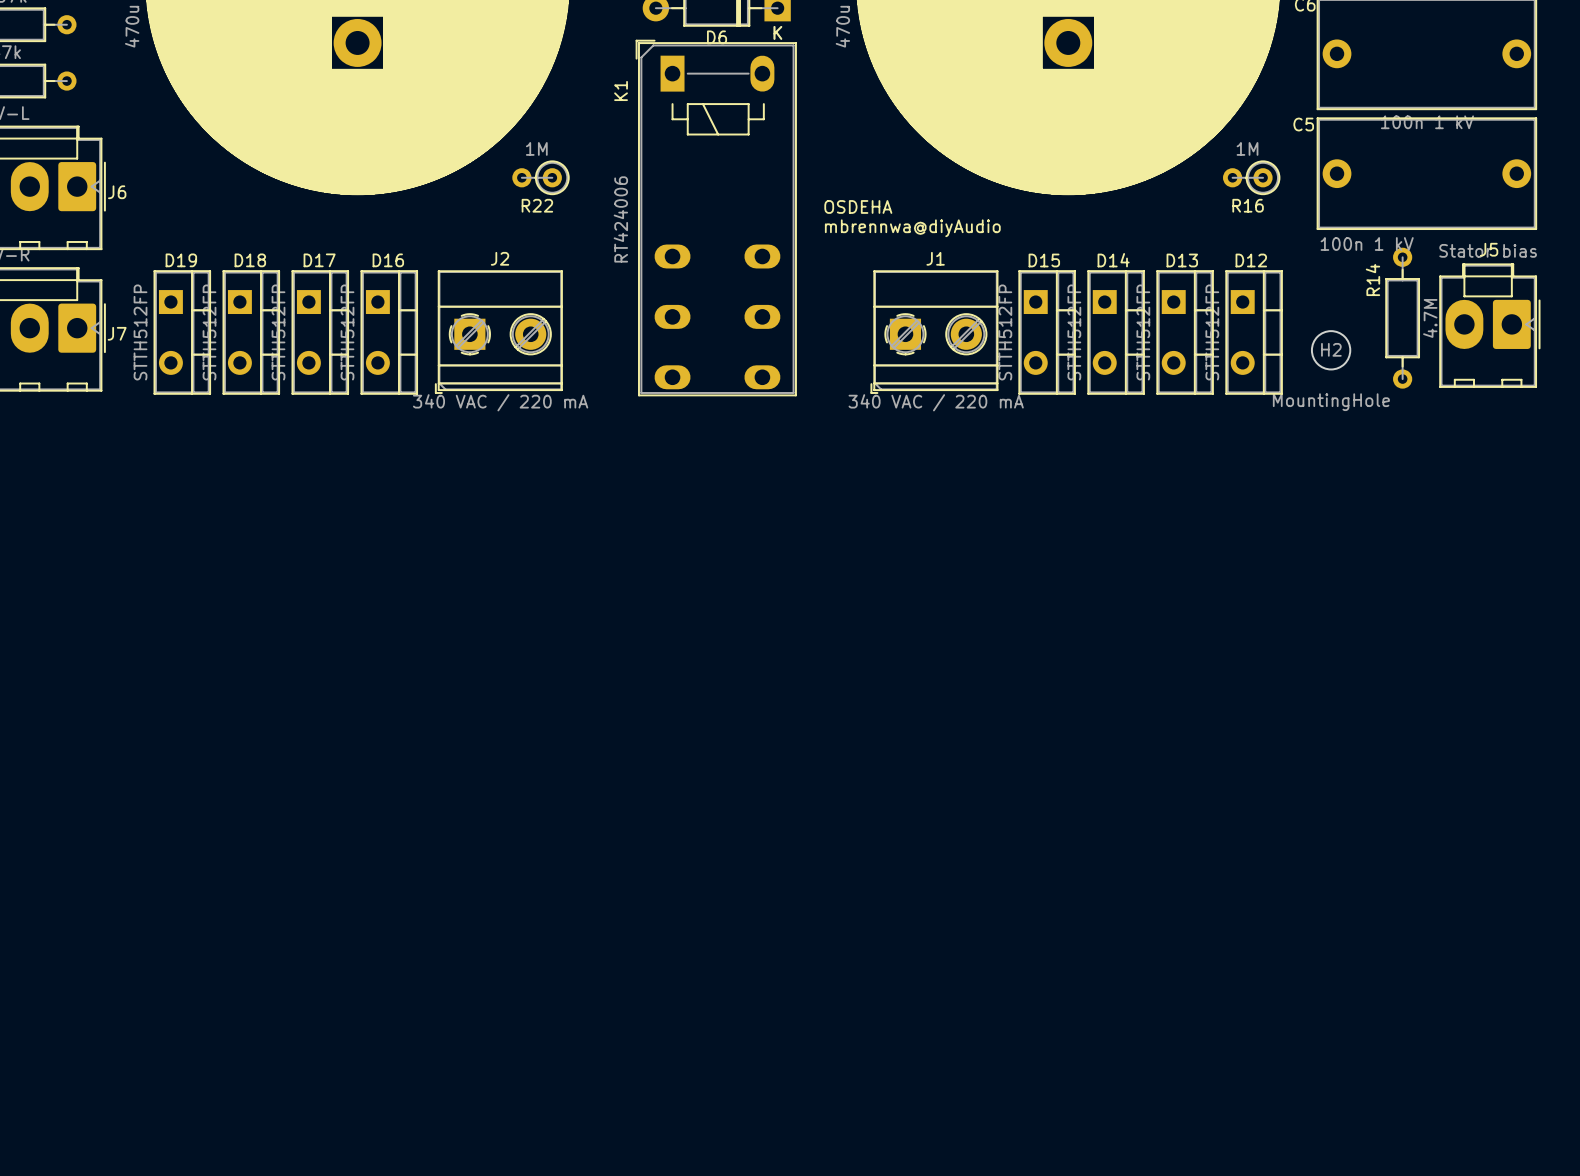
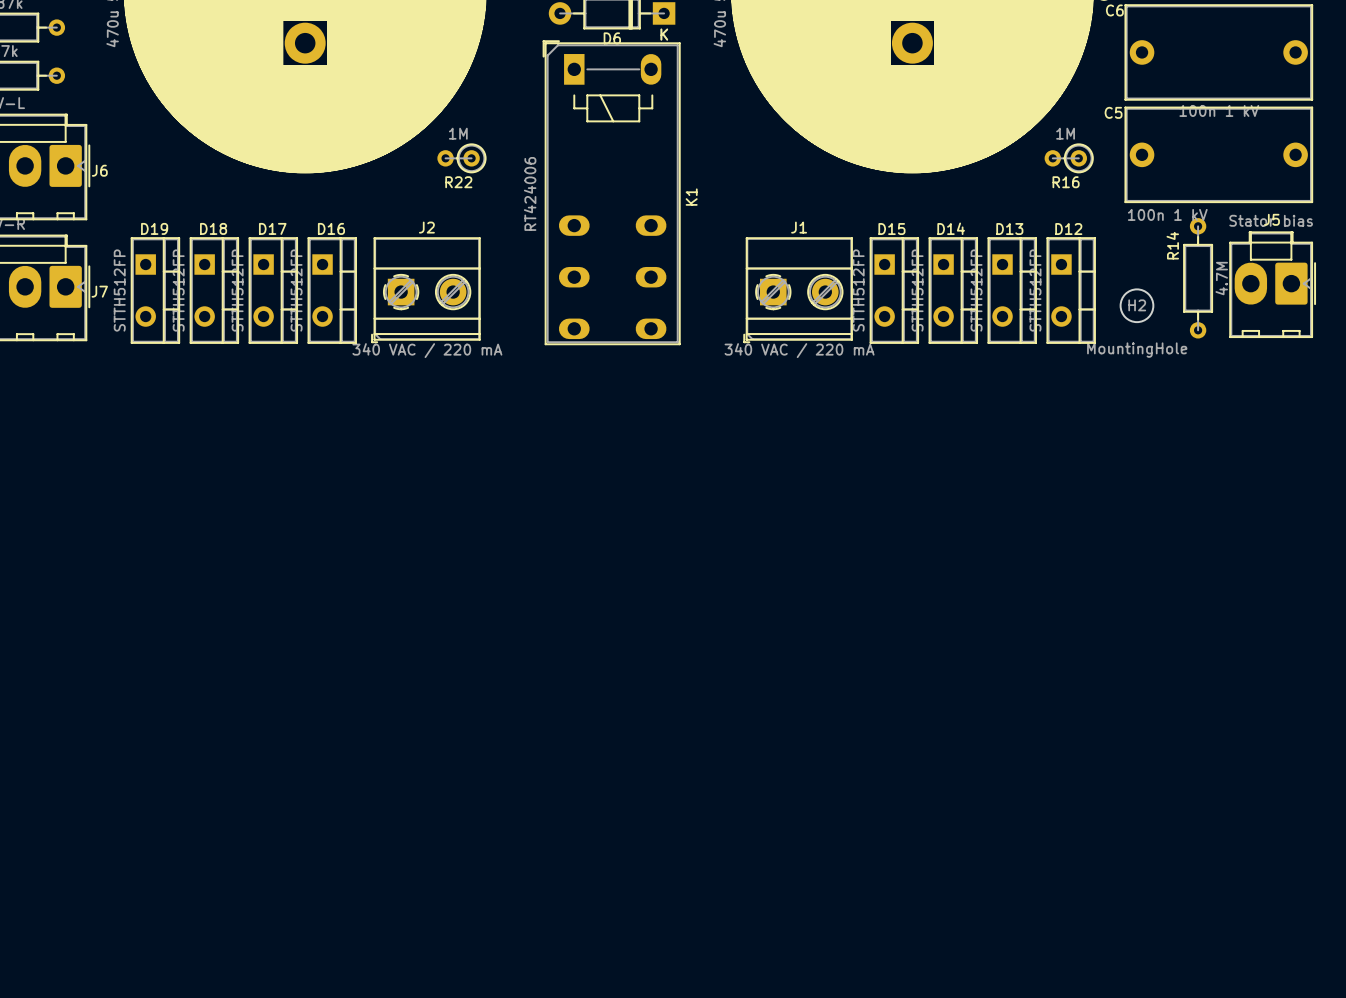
K1 name position: K1 (621, 90) -> K1 (691, 197)
text: OSDEHA (858, 206) -> none
text: mbrennwa@diyAudio (912, 228) -> none

